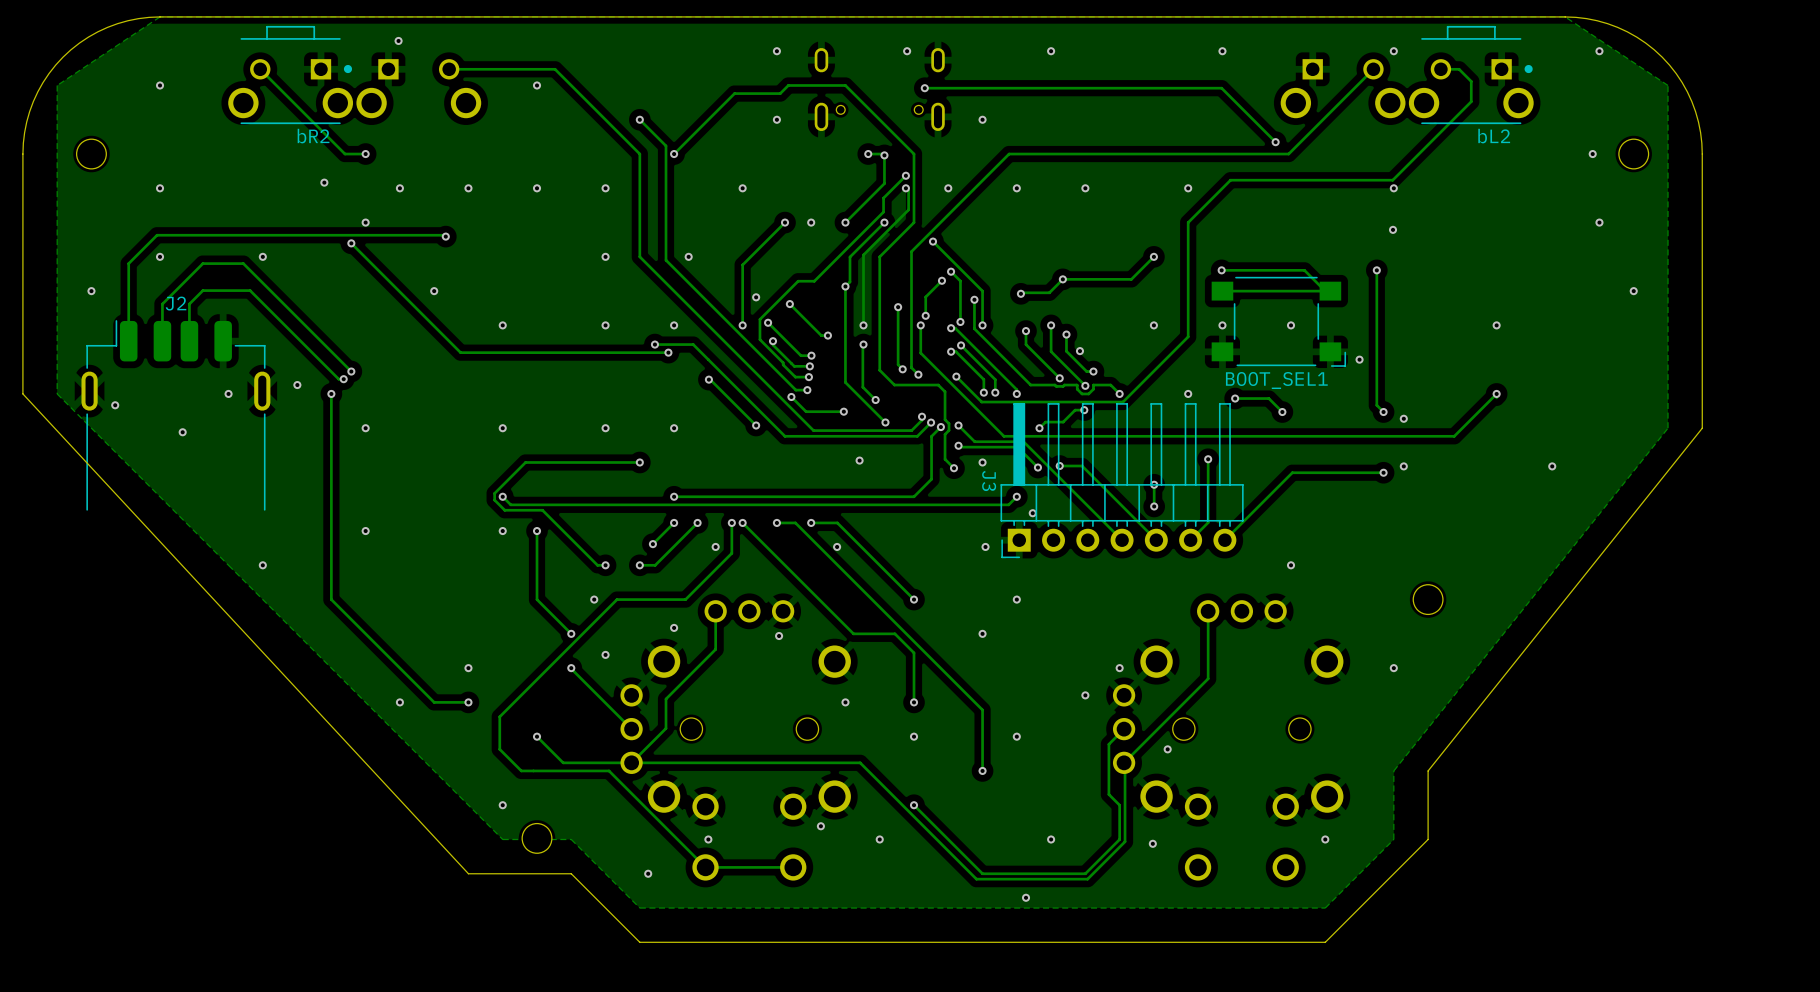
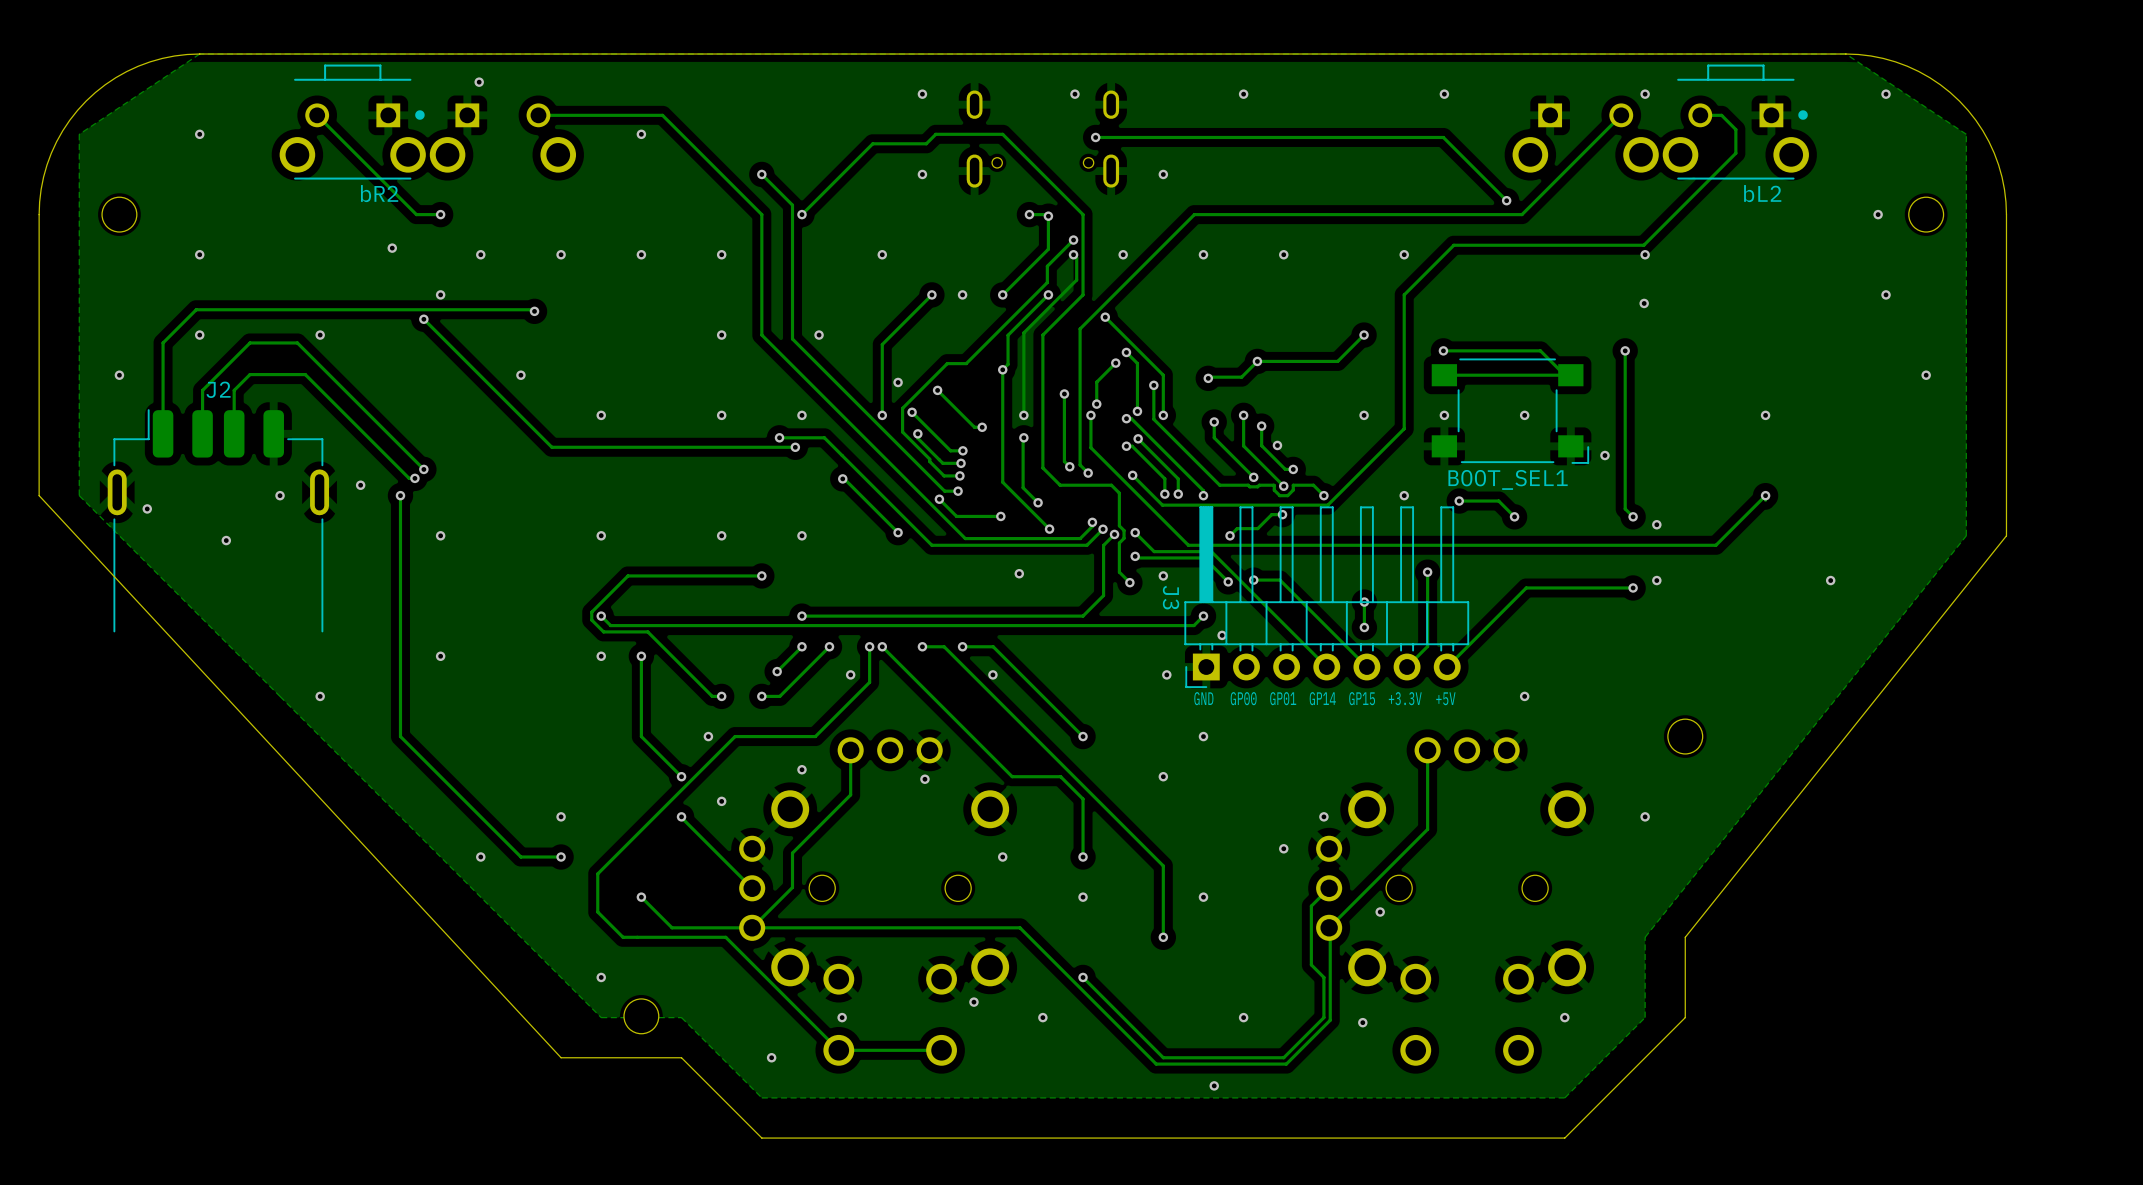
text: none -> GND (1203, 698)
text: none -> GP00 (1243, 698)
text: none -> GP01 (1283, 698)
text: none -> GP14 (1322, 698)
text: none -> GP15 (1362, 698)
text: none -> +3.3V (1405, 698)
text: none -> +5V (1445, 698)

